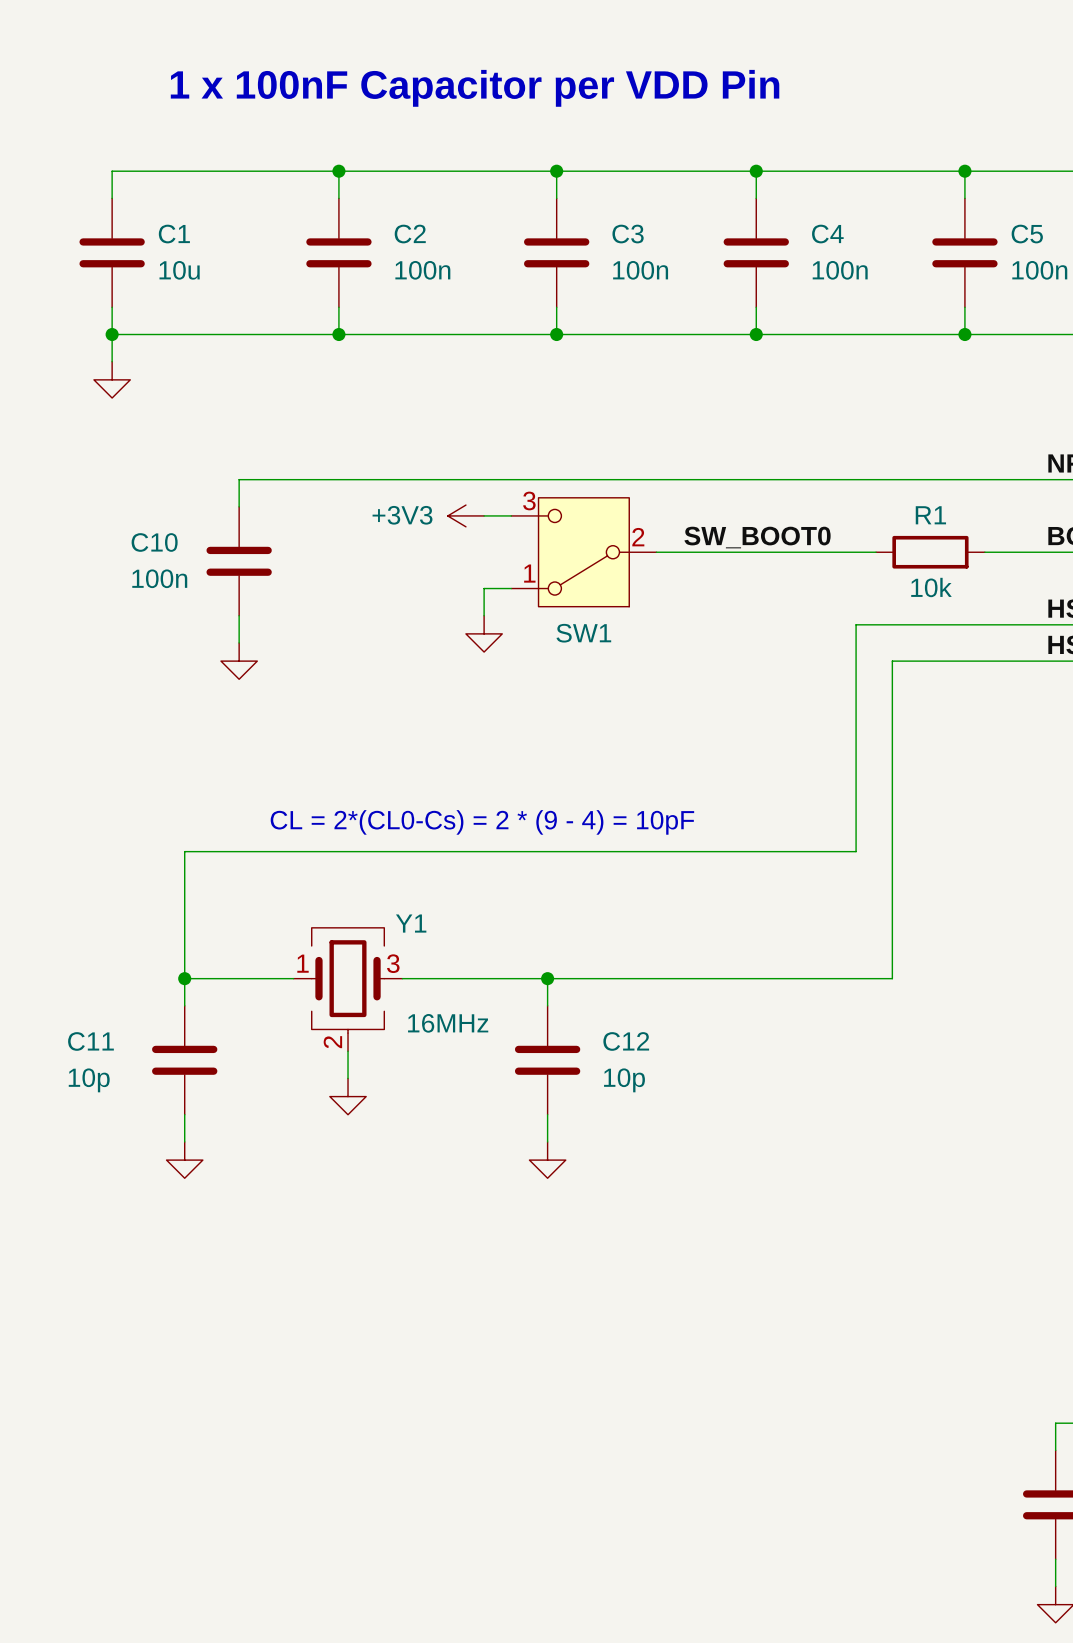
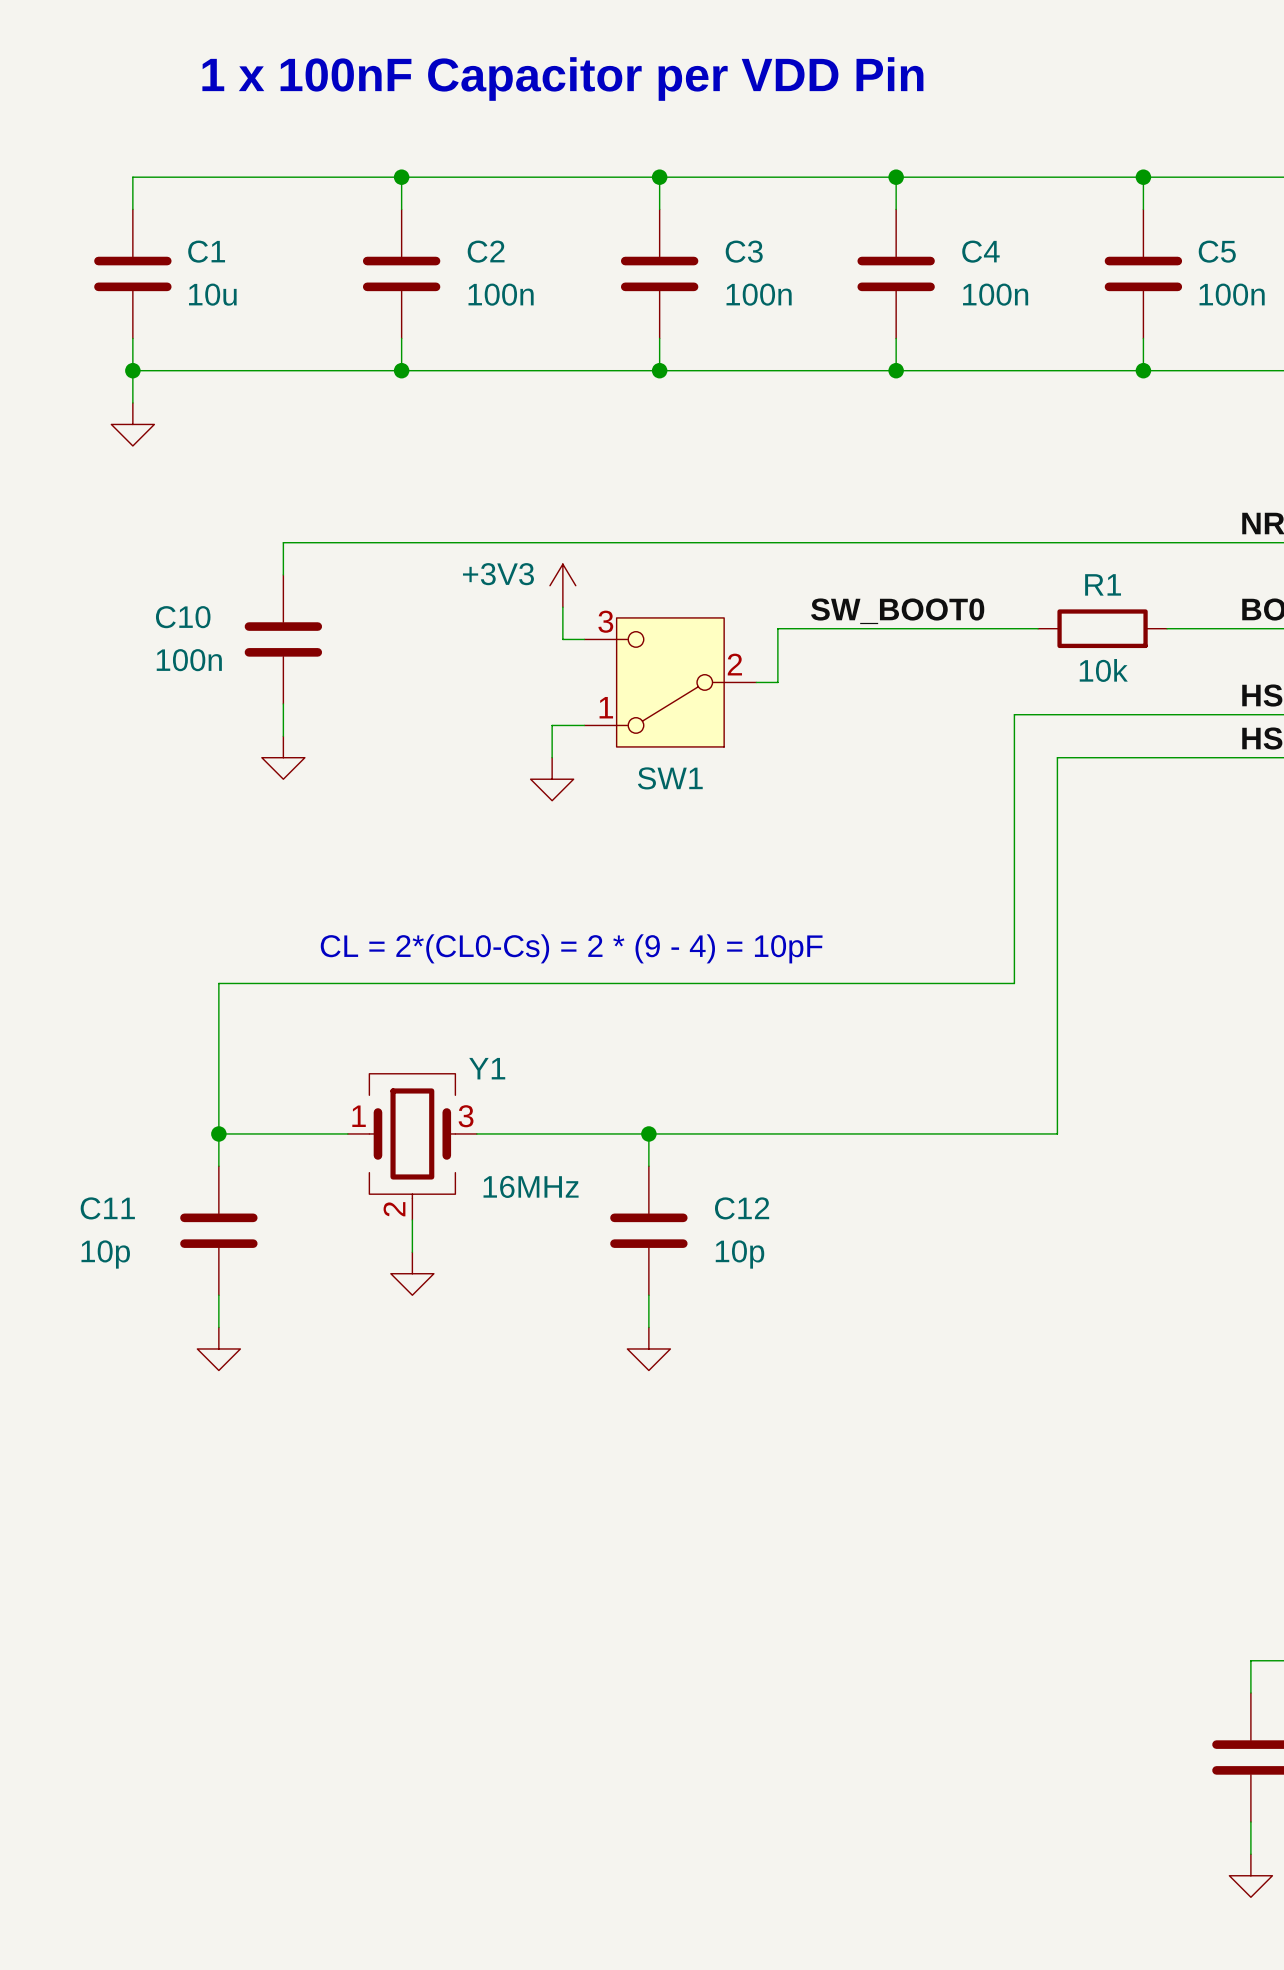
power symbol rotation: 0° (465, 515) -> 90° clockwise (562, 585)
wire: (484, 515) (511, 515) -> none
wire: none -> (562, 607) (562, 639) (584, 639)
SW1 position: (583, 552) -> (670, 682)
wire: none -> (777, 628) (777, 682) (756, 682)
wire: (511, 588) (484, 588) (484, 615) -> (584, 725) (552, 725) (552, 757)
power symbol position: (484, 633) -> (552, 779)

